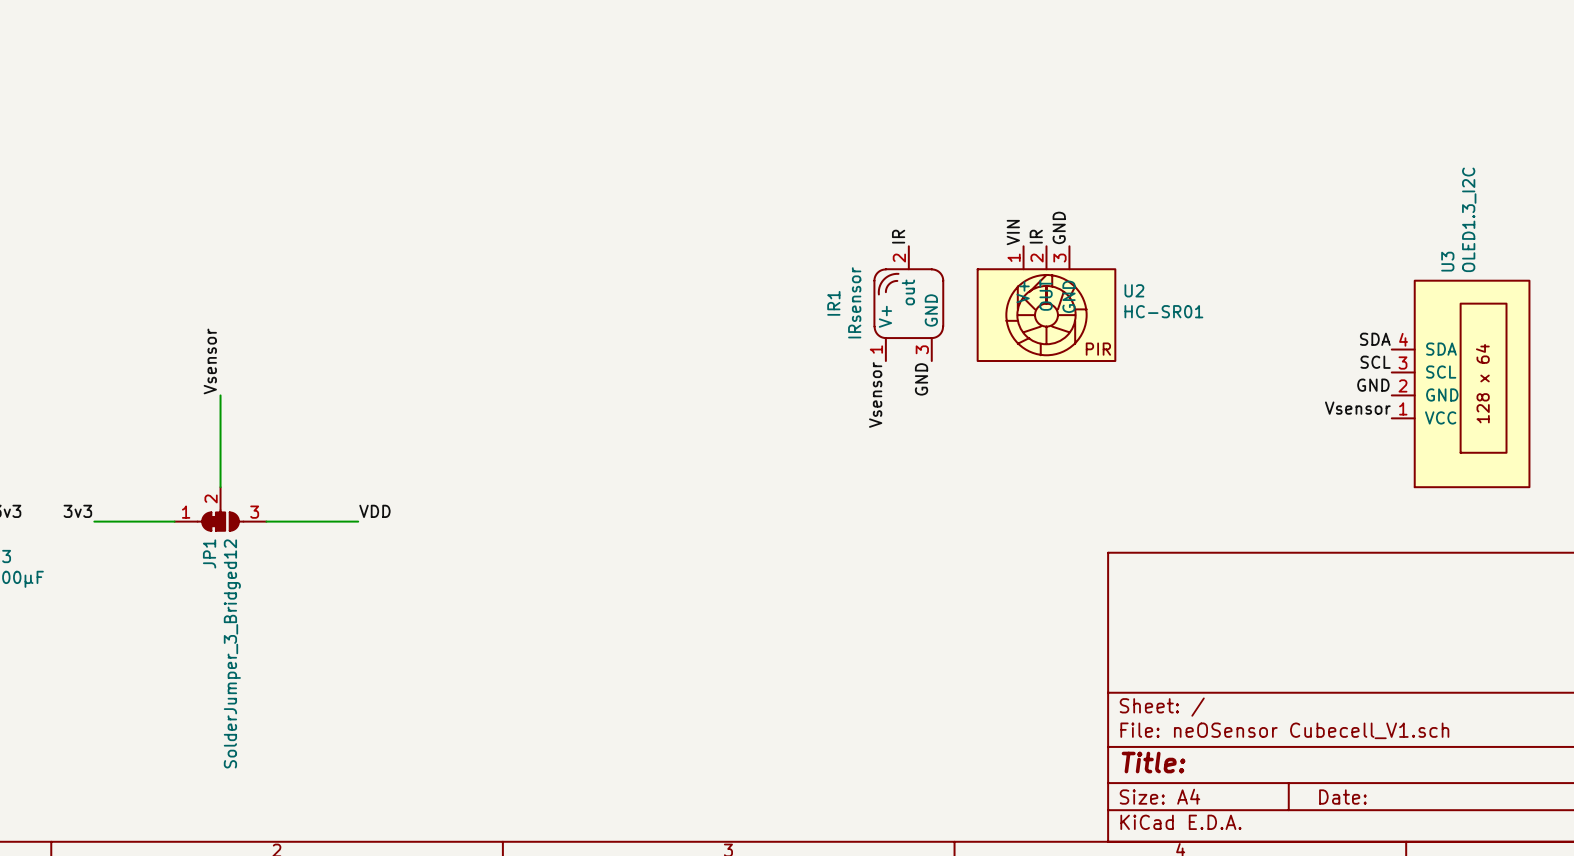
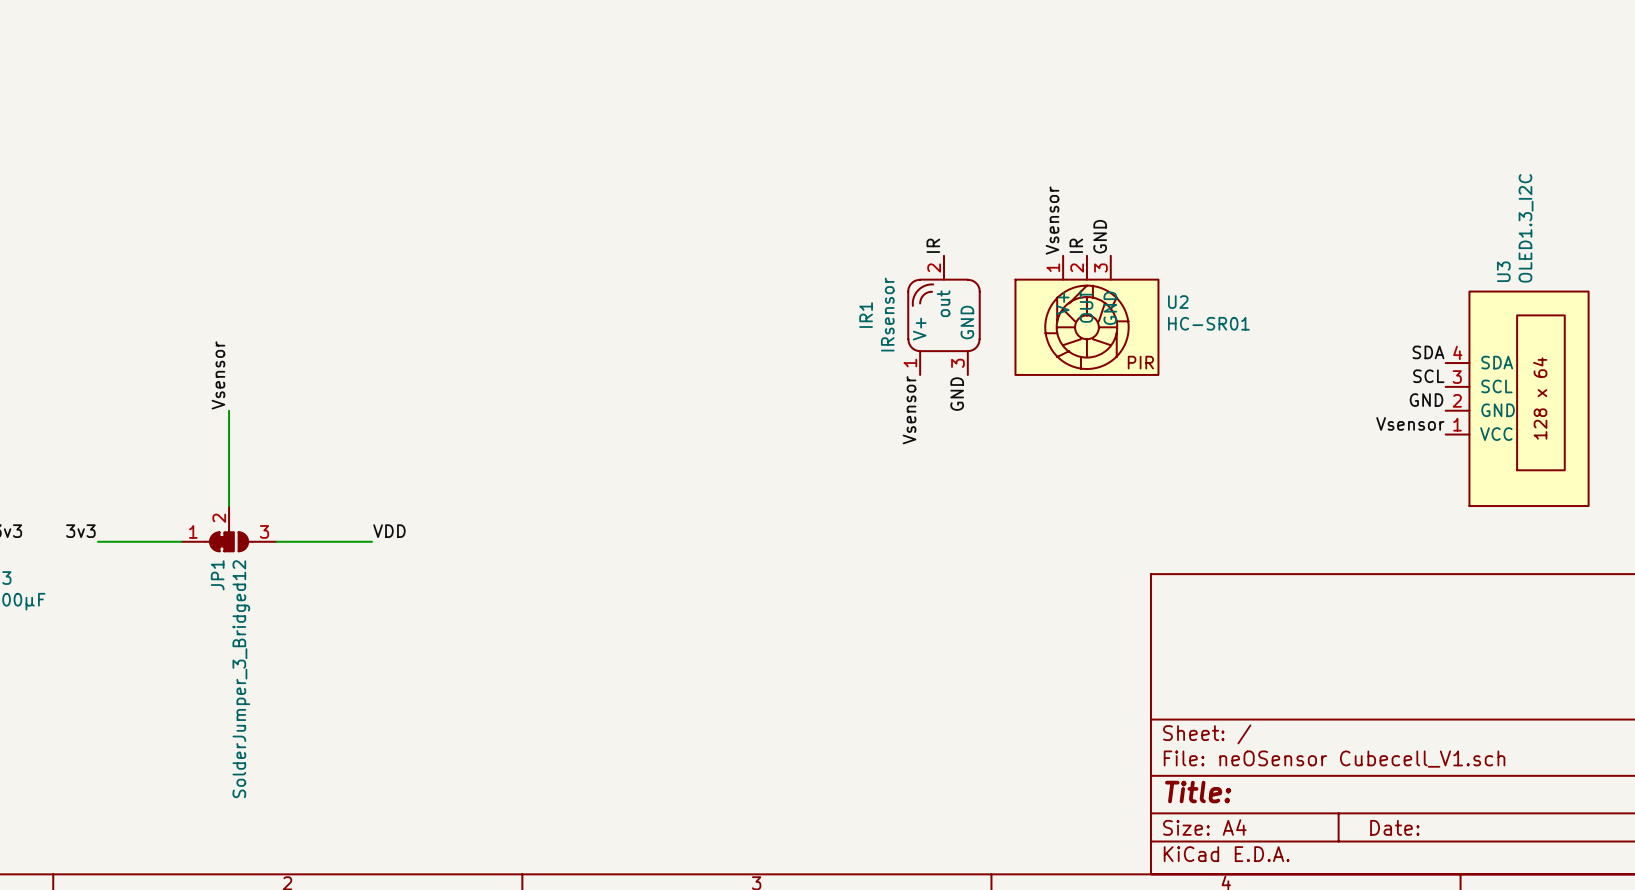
label: VIN (1013, 232) -> Vsensor (1052, 220)

